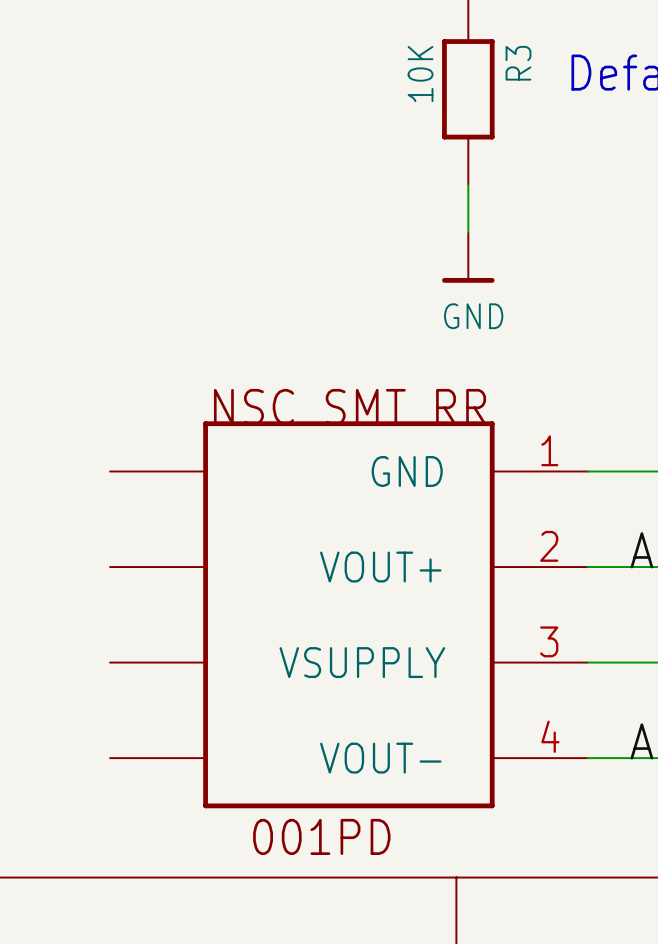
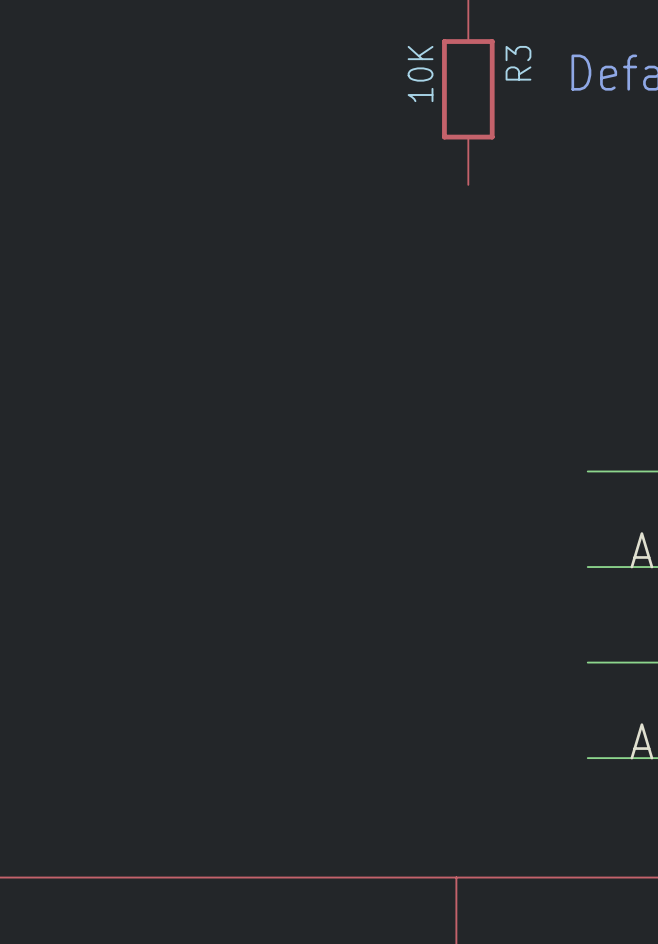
wire: (468, 184) (468, 232) -> none
power symbol: GND (468, 257) -> none
part: (348, 614) -> none

